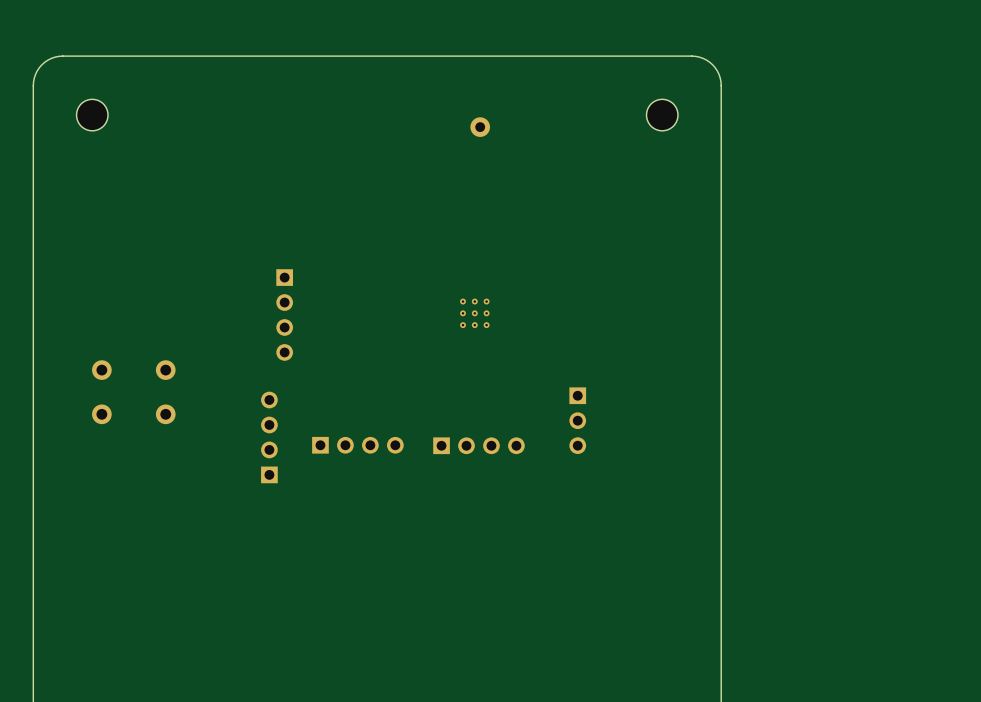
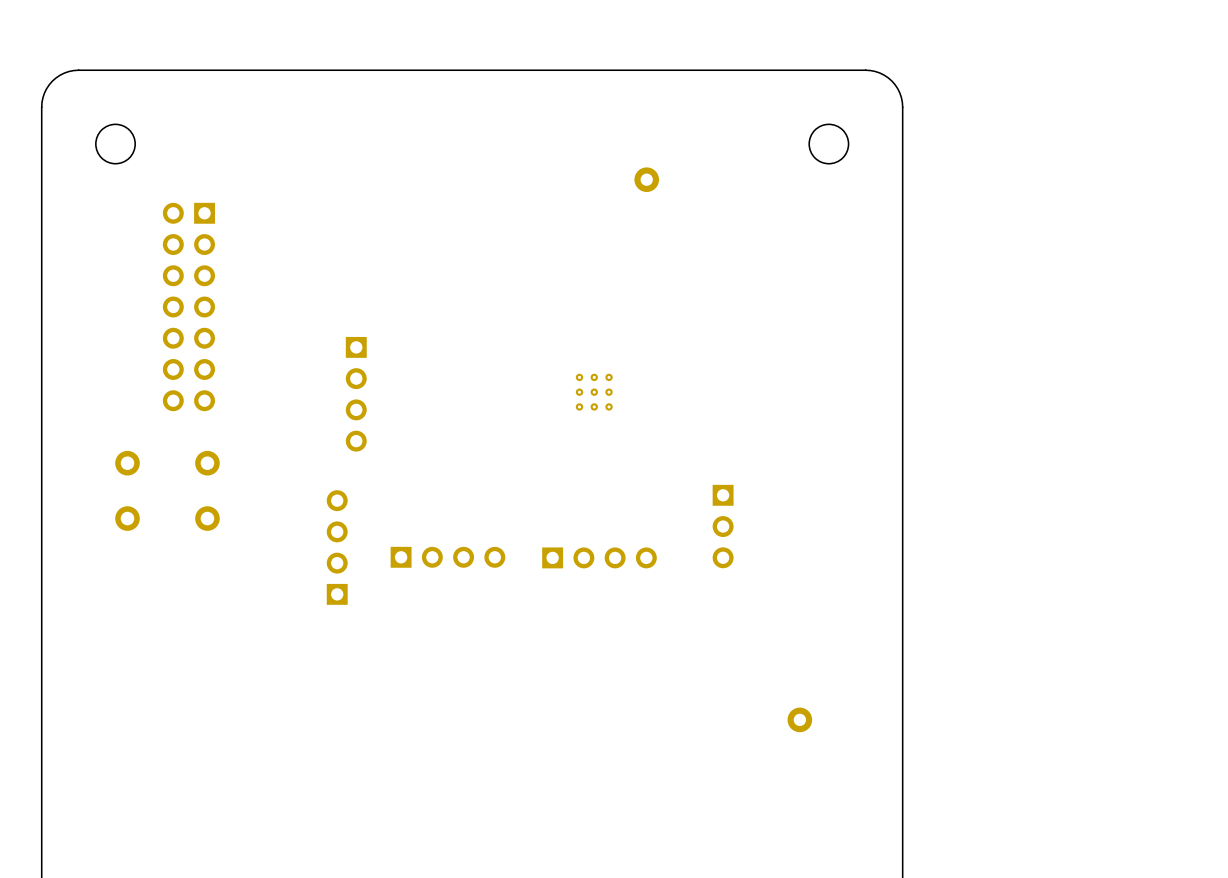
part position: (480, 127) -> (646, 179)
part: none -> (188, 307)
part: none -> (799, 719)

